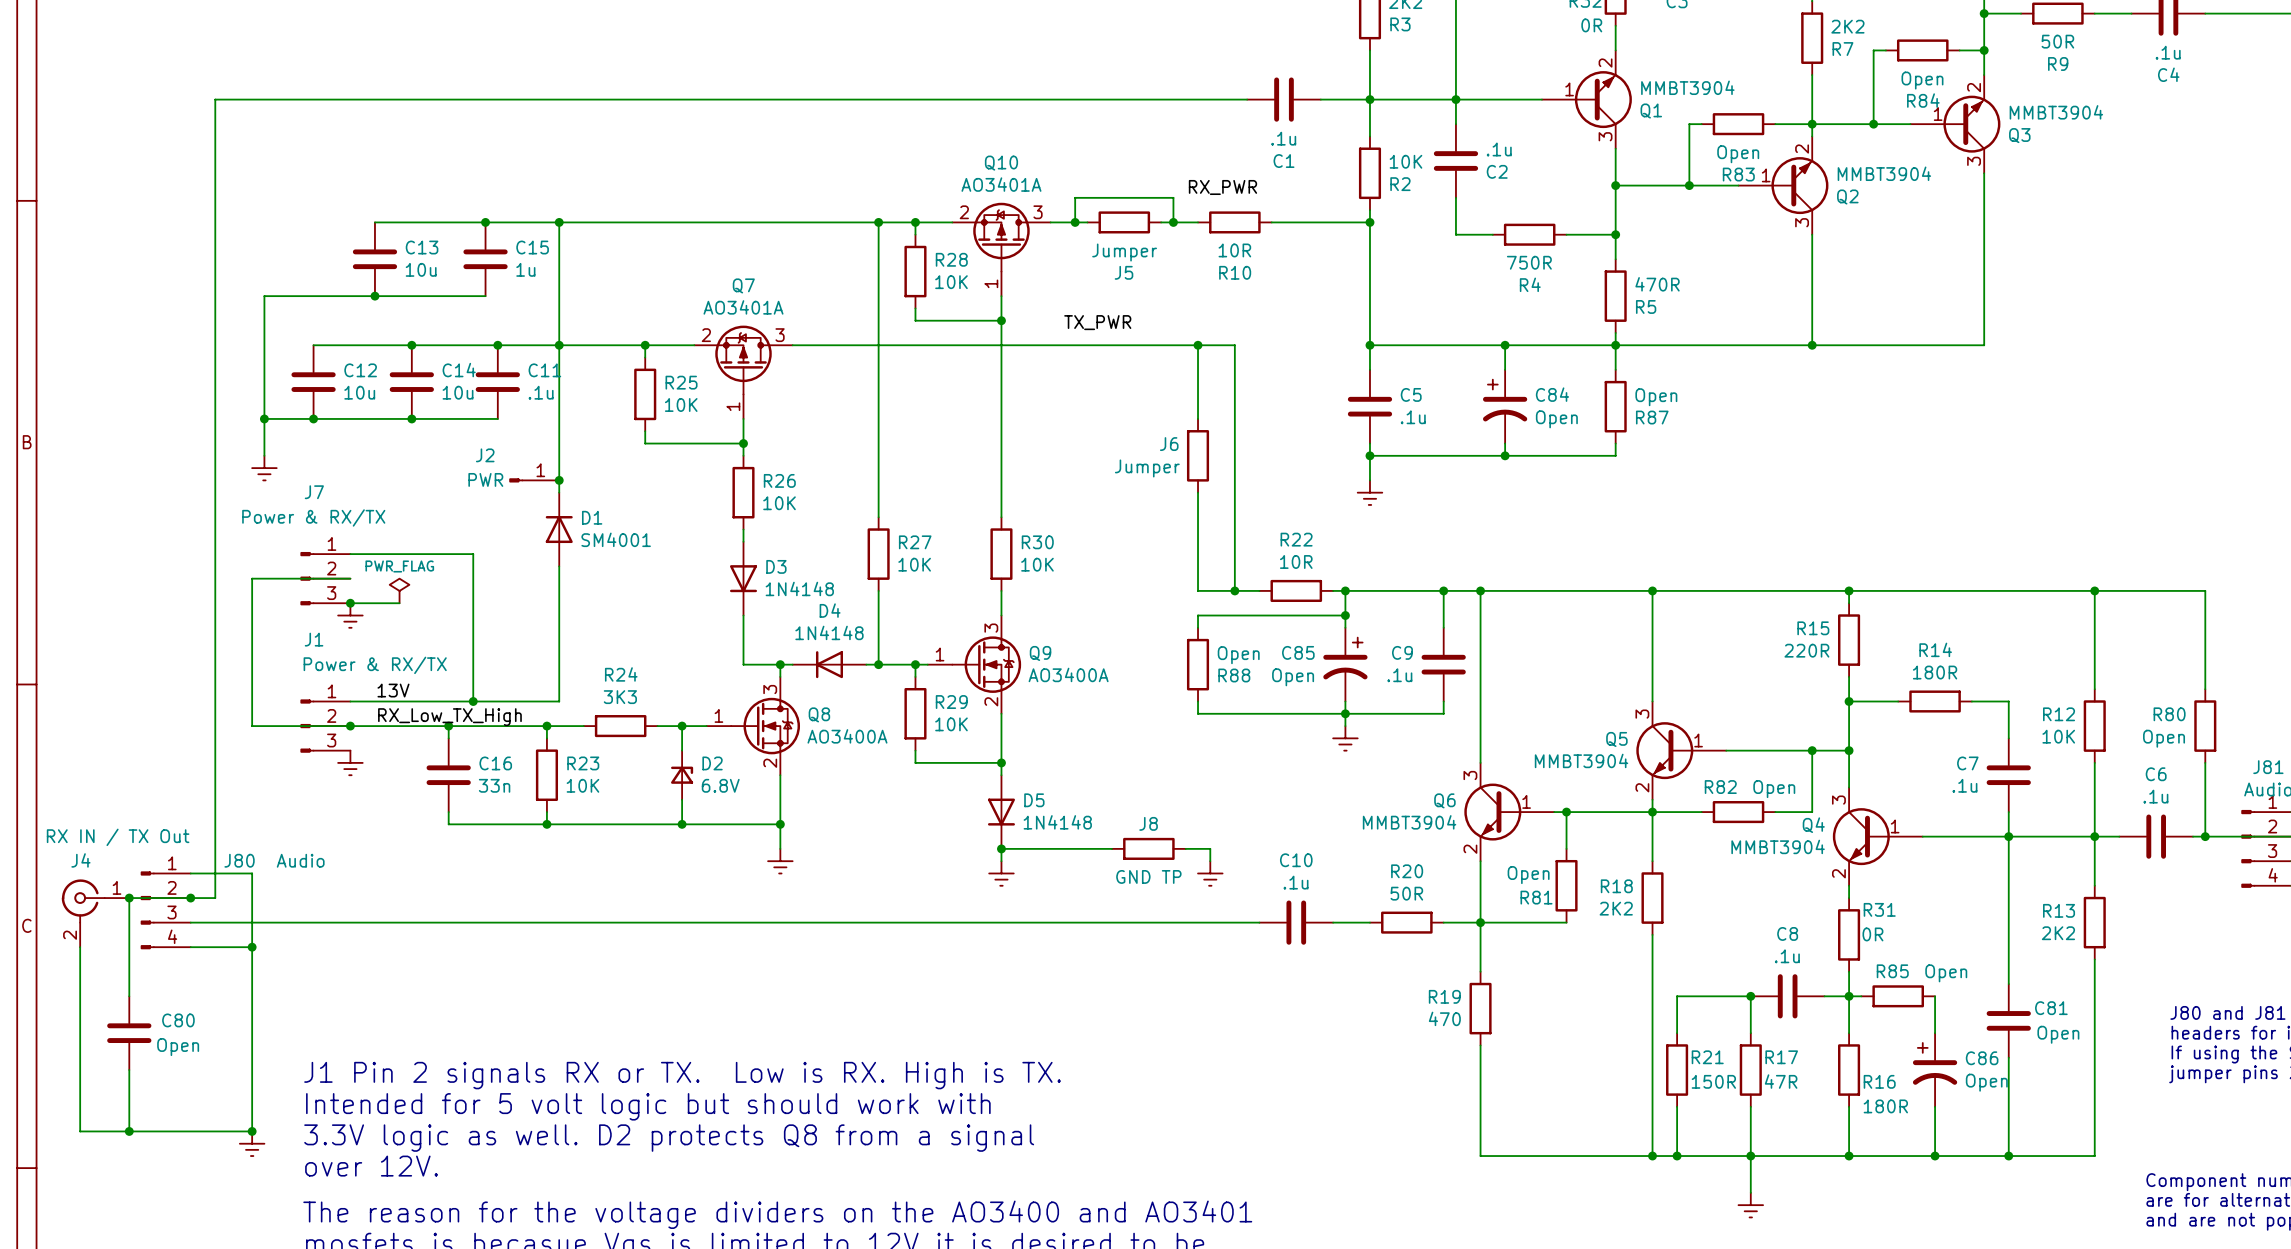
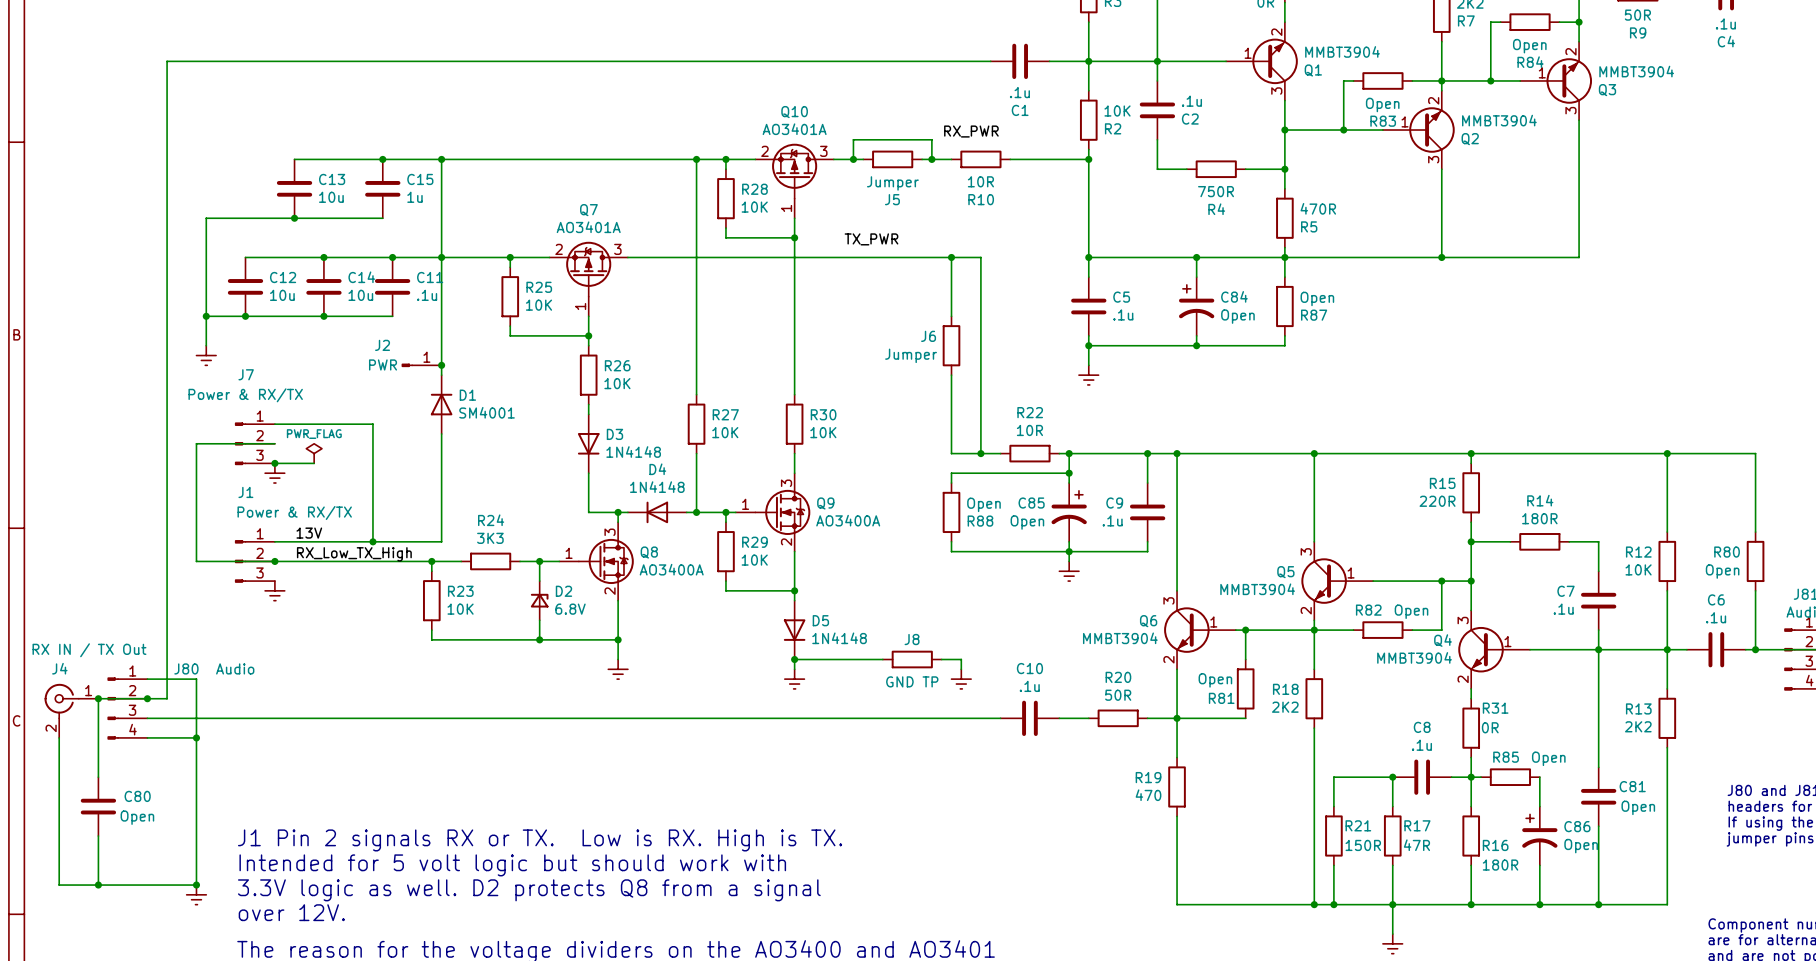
wire: (448, 726) (448, 738) -> none
junction: (448, 726) -> none
C16: 33n (448, 775) -> none
wire: (448, 812) (448, 824) (546, 824) -> none
junction: (546, 824) -> none

